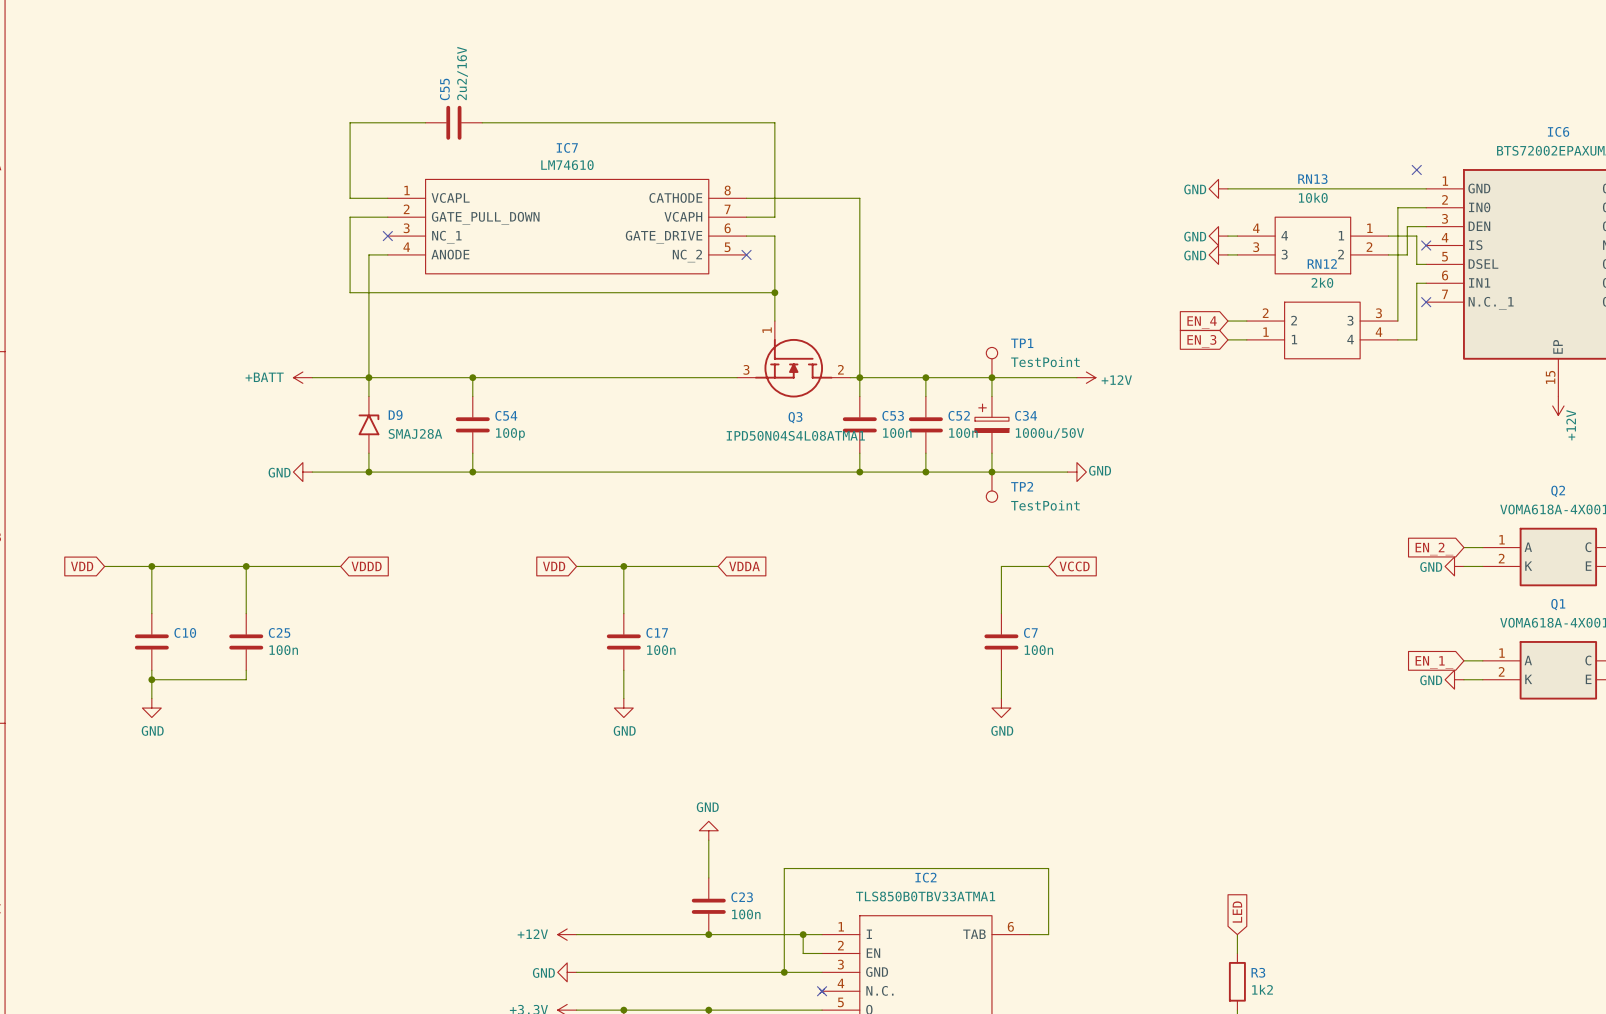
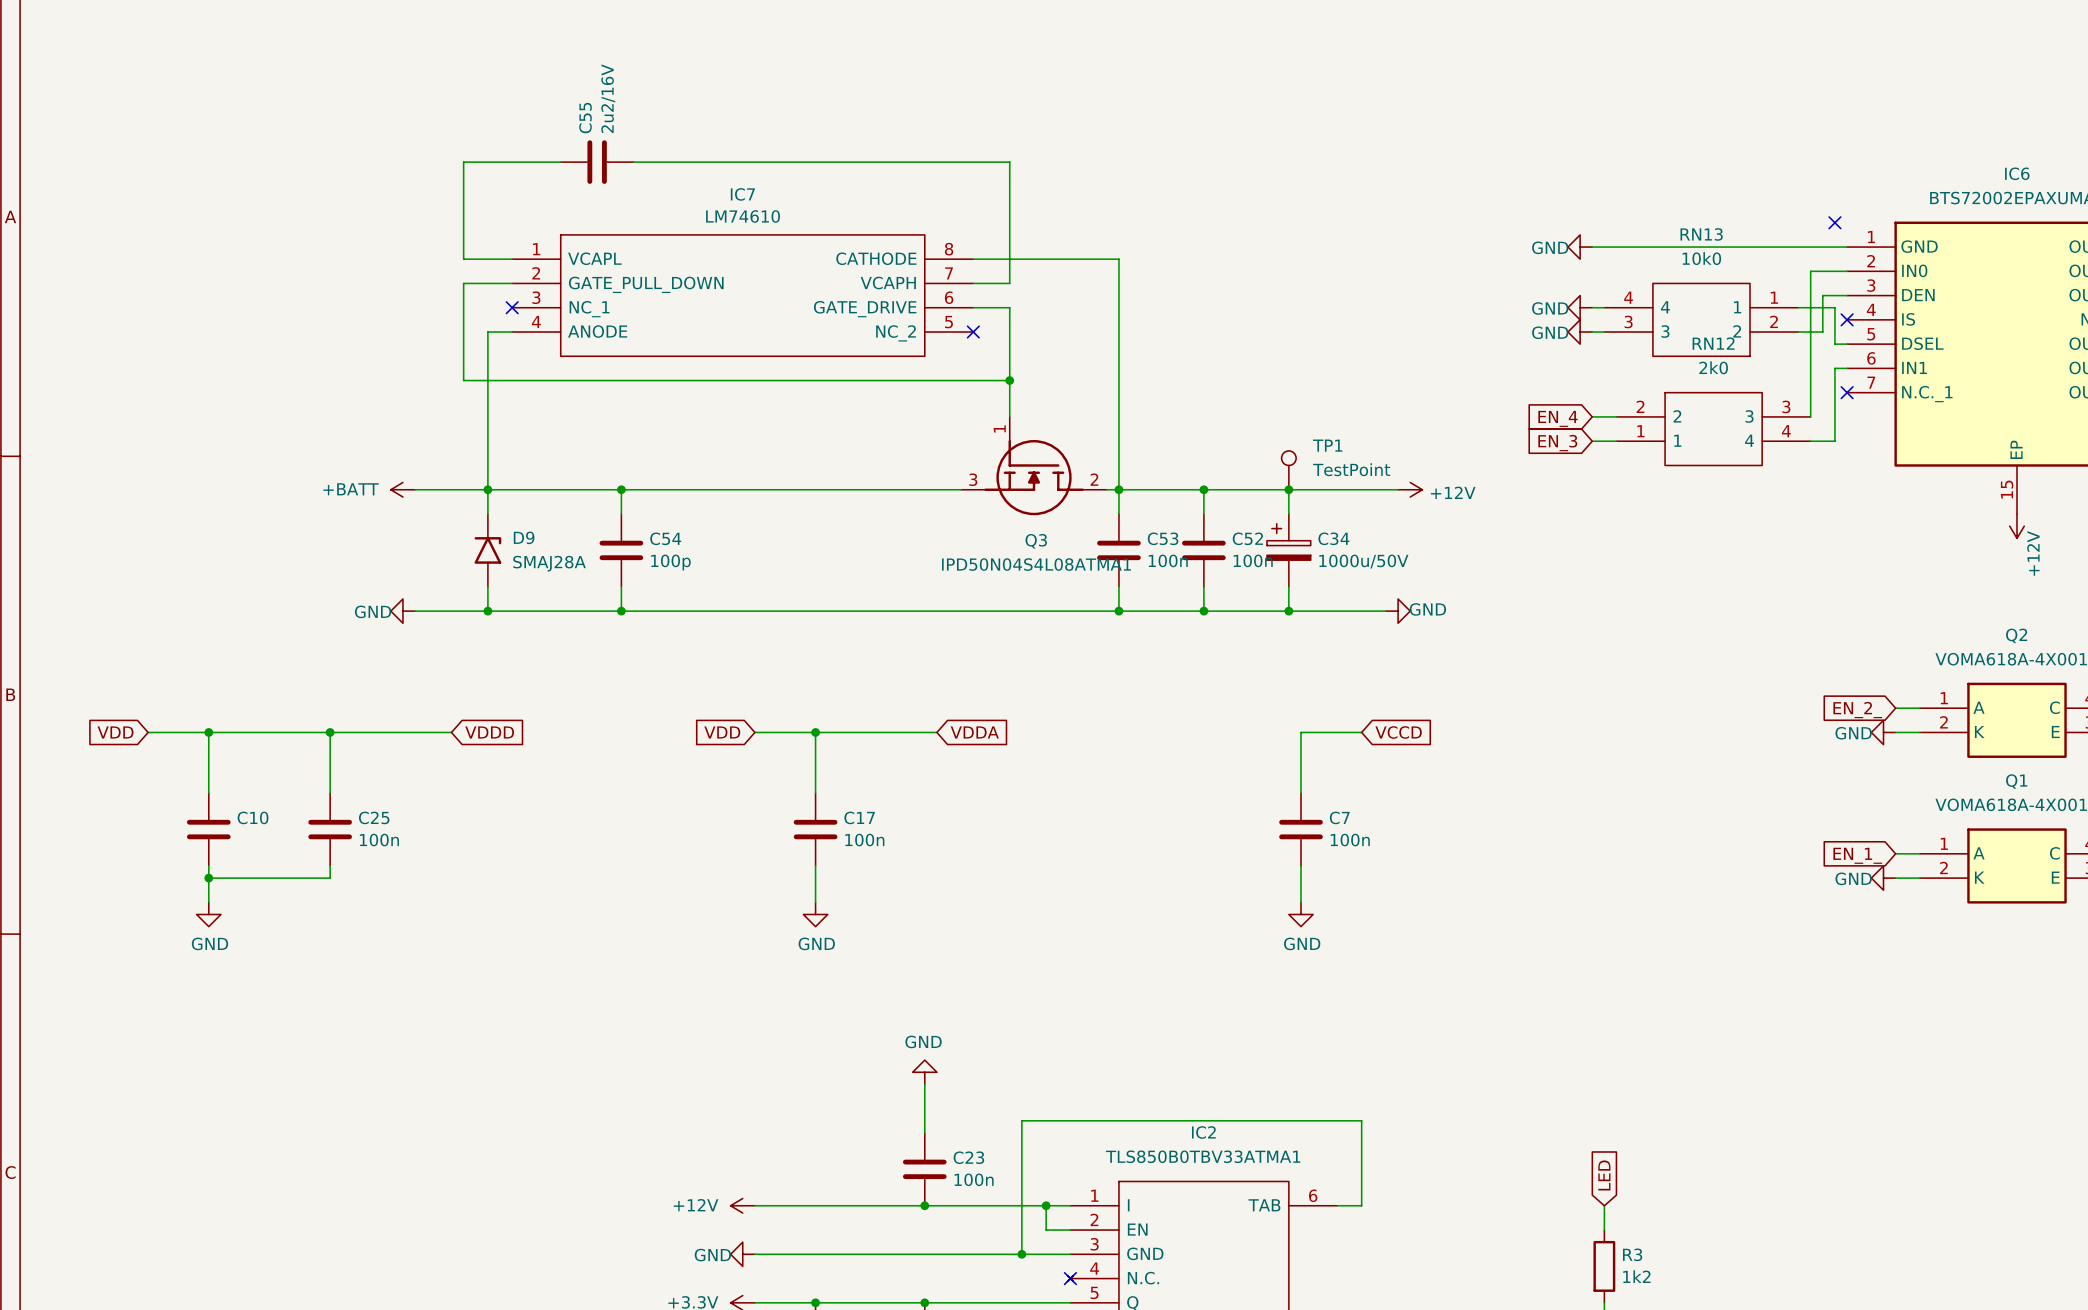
TP2: TestPoint (991, 487) -> none

